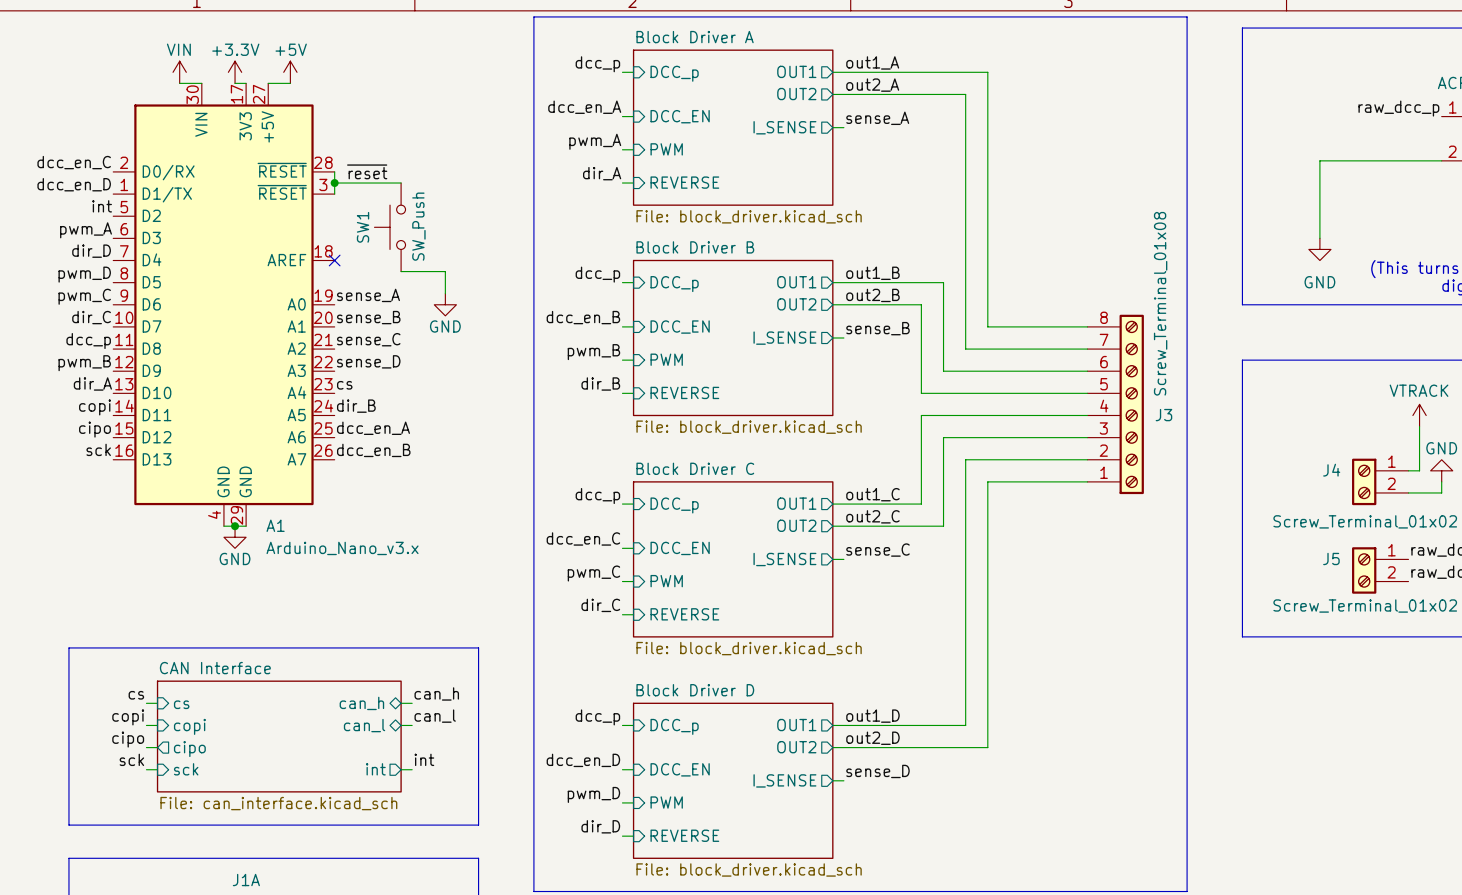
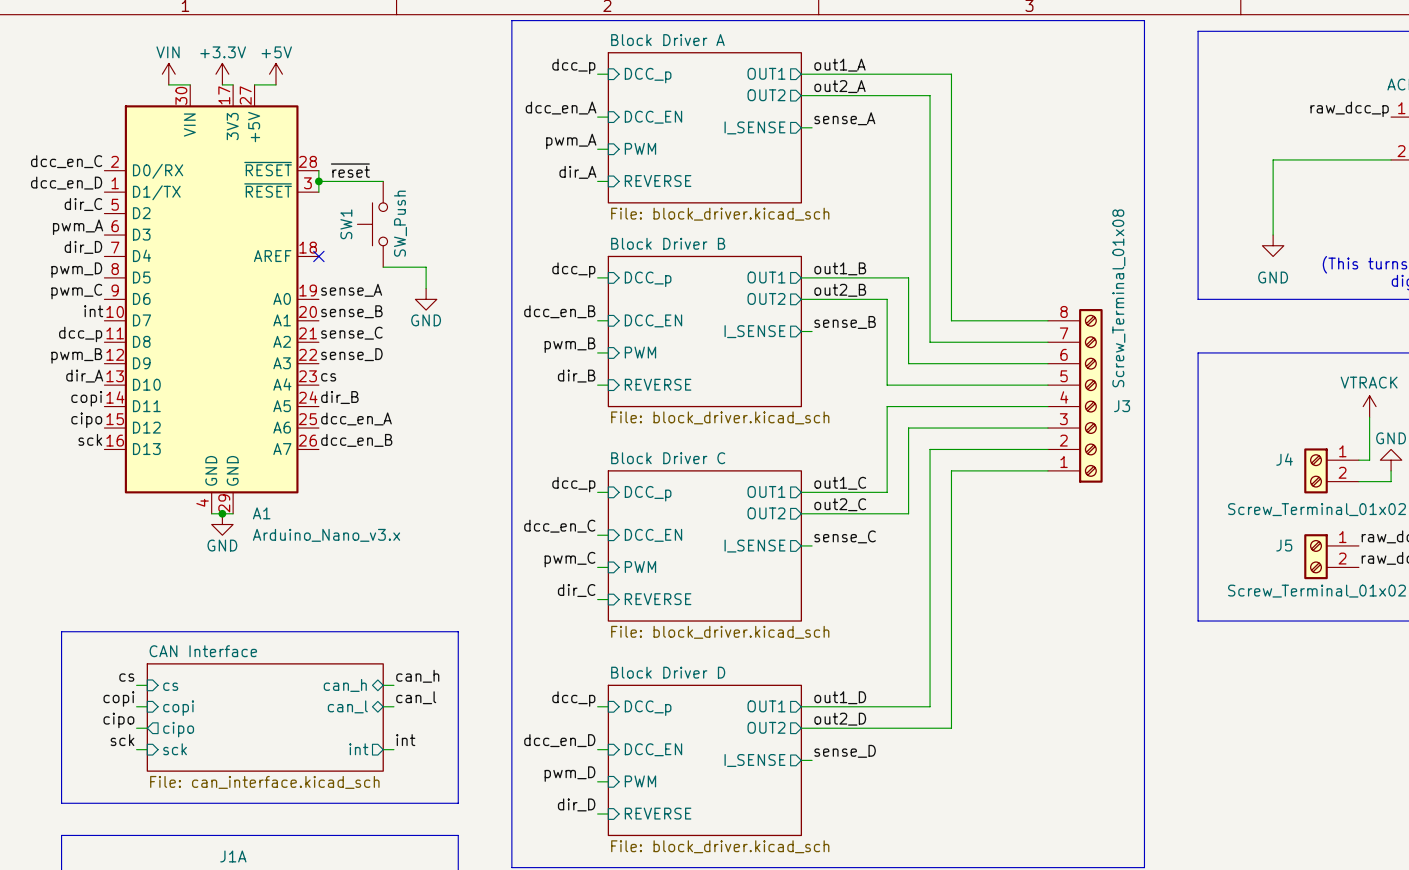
label: int (102, 206) -> dir_C (83, 204)
label: dir_C (91, 317) -> int (93, 311)

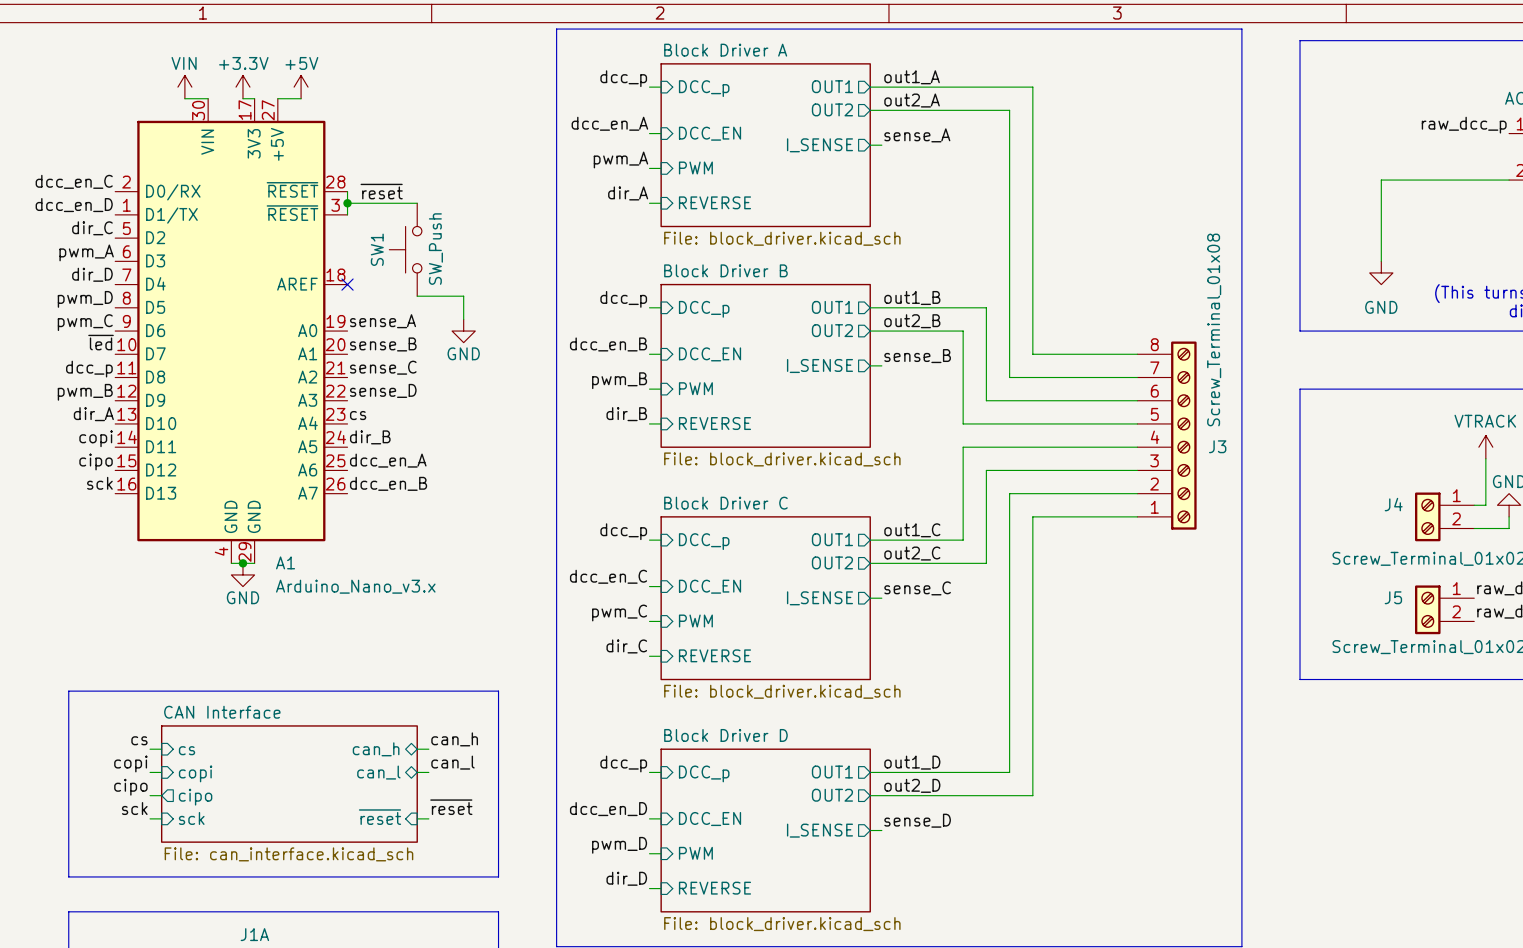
label: int (93, 311) -> ~{led} (101, 342)
label: int (405, 740) -> ~{reset} (451, 807)
sheet pin shape: output (358, 749) -> input (380, 817)
sheet pin: int (358, 749) -> ~{reset} (380, 817)

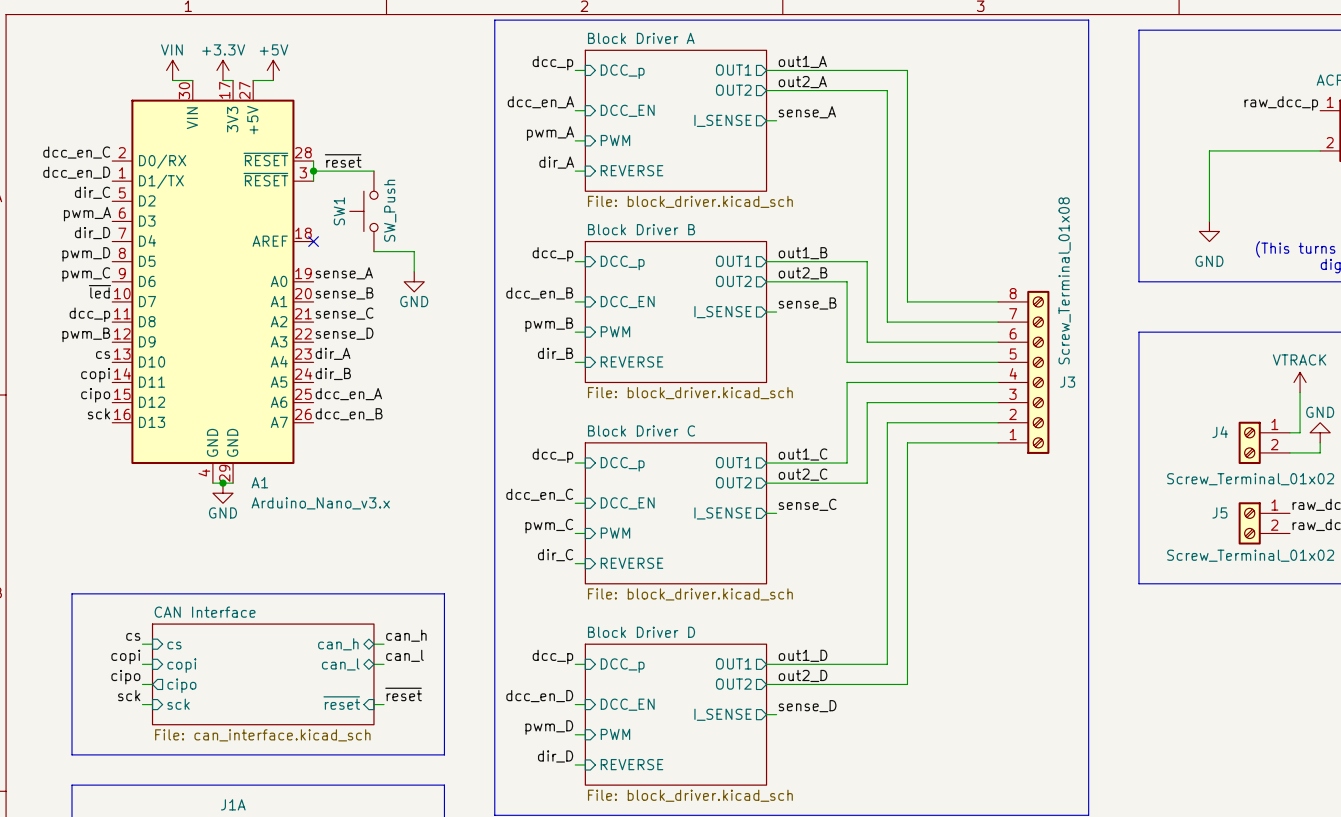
label: dir_A (93, 414) -> cs (103, 355)
label: cs (358, 415) -> dir_A (333, 353)

